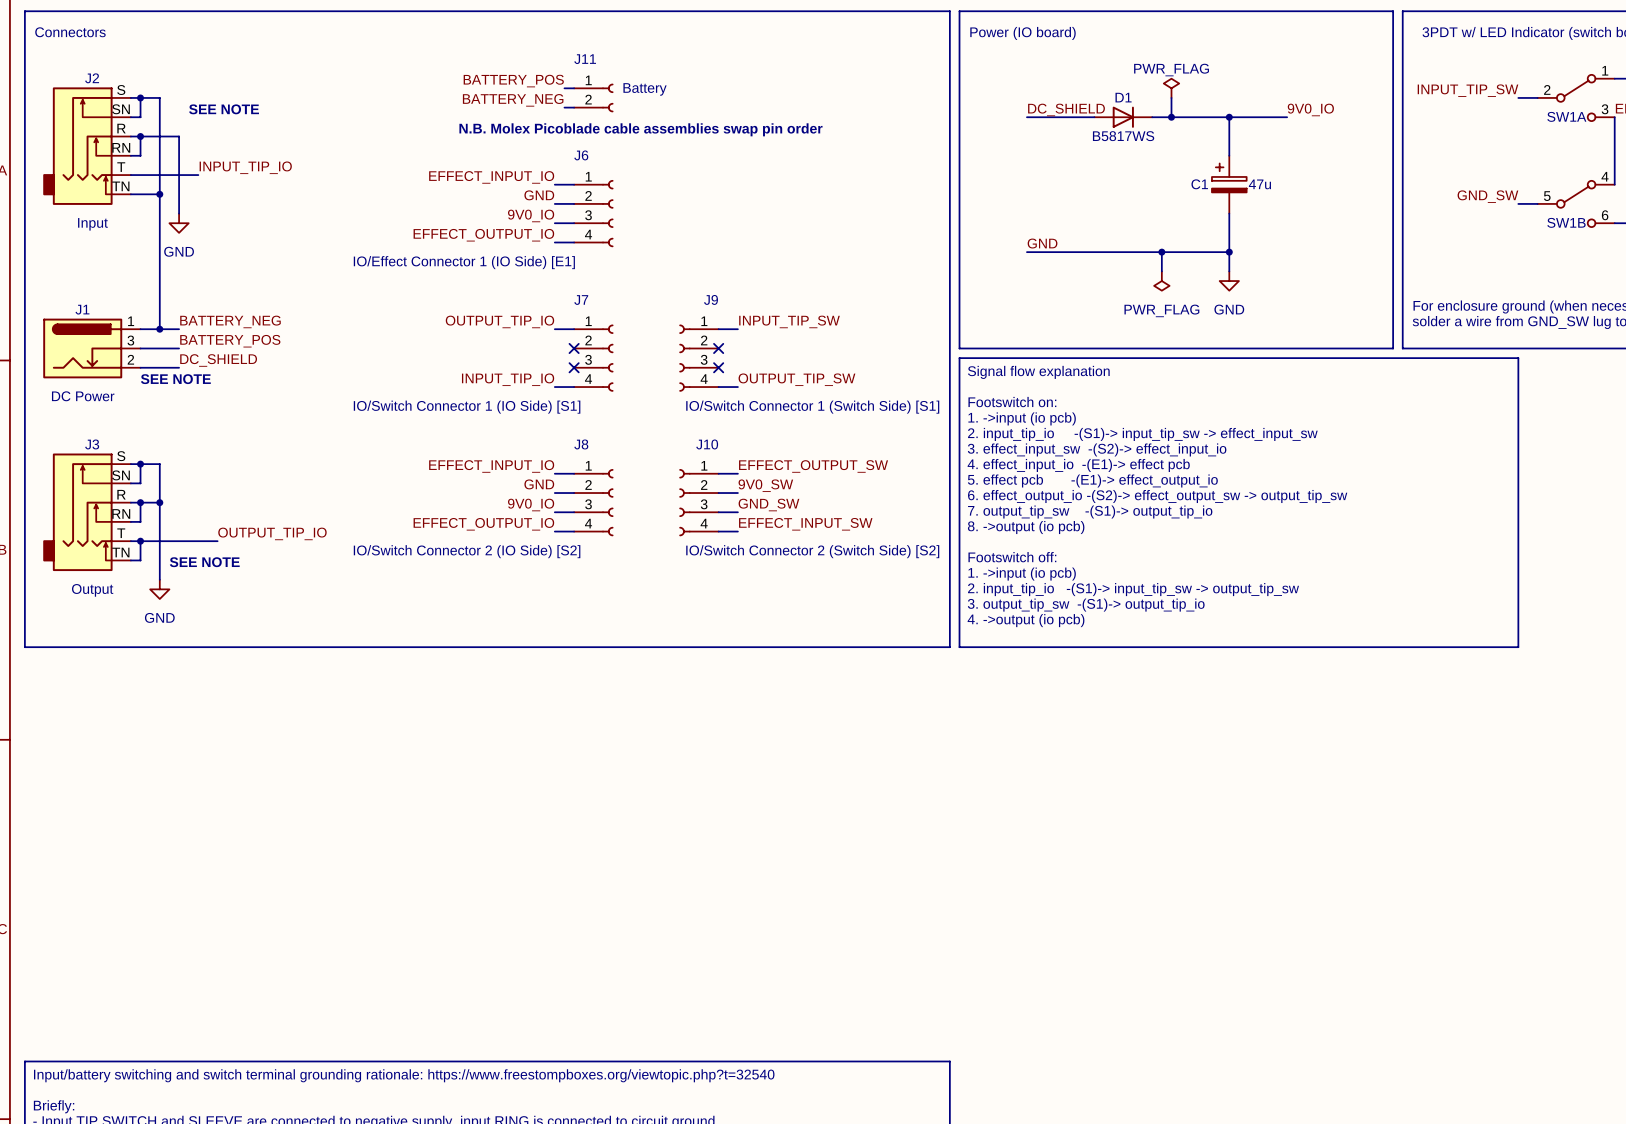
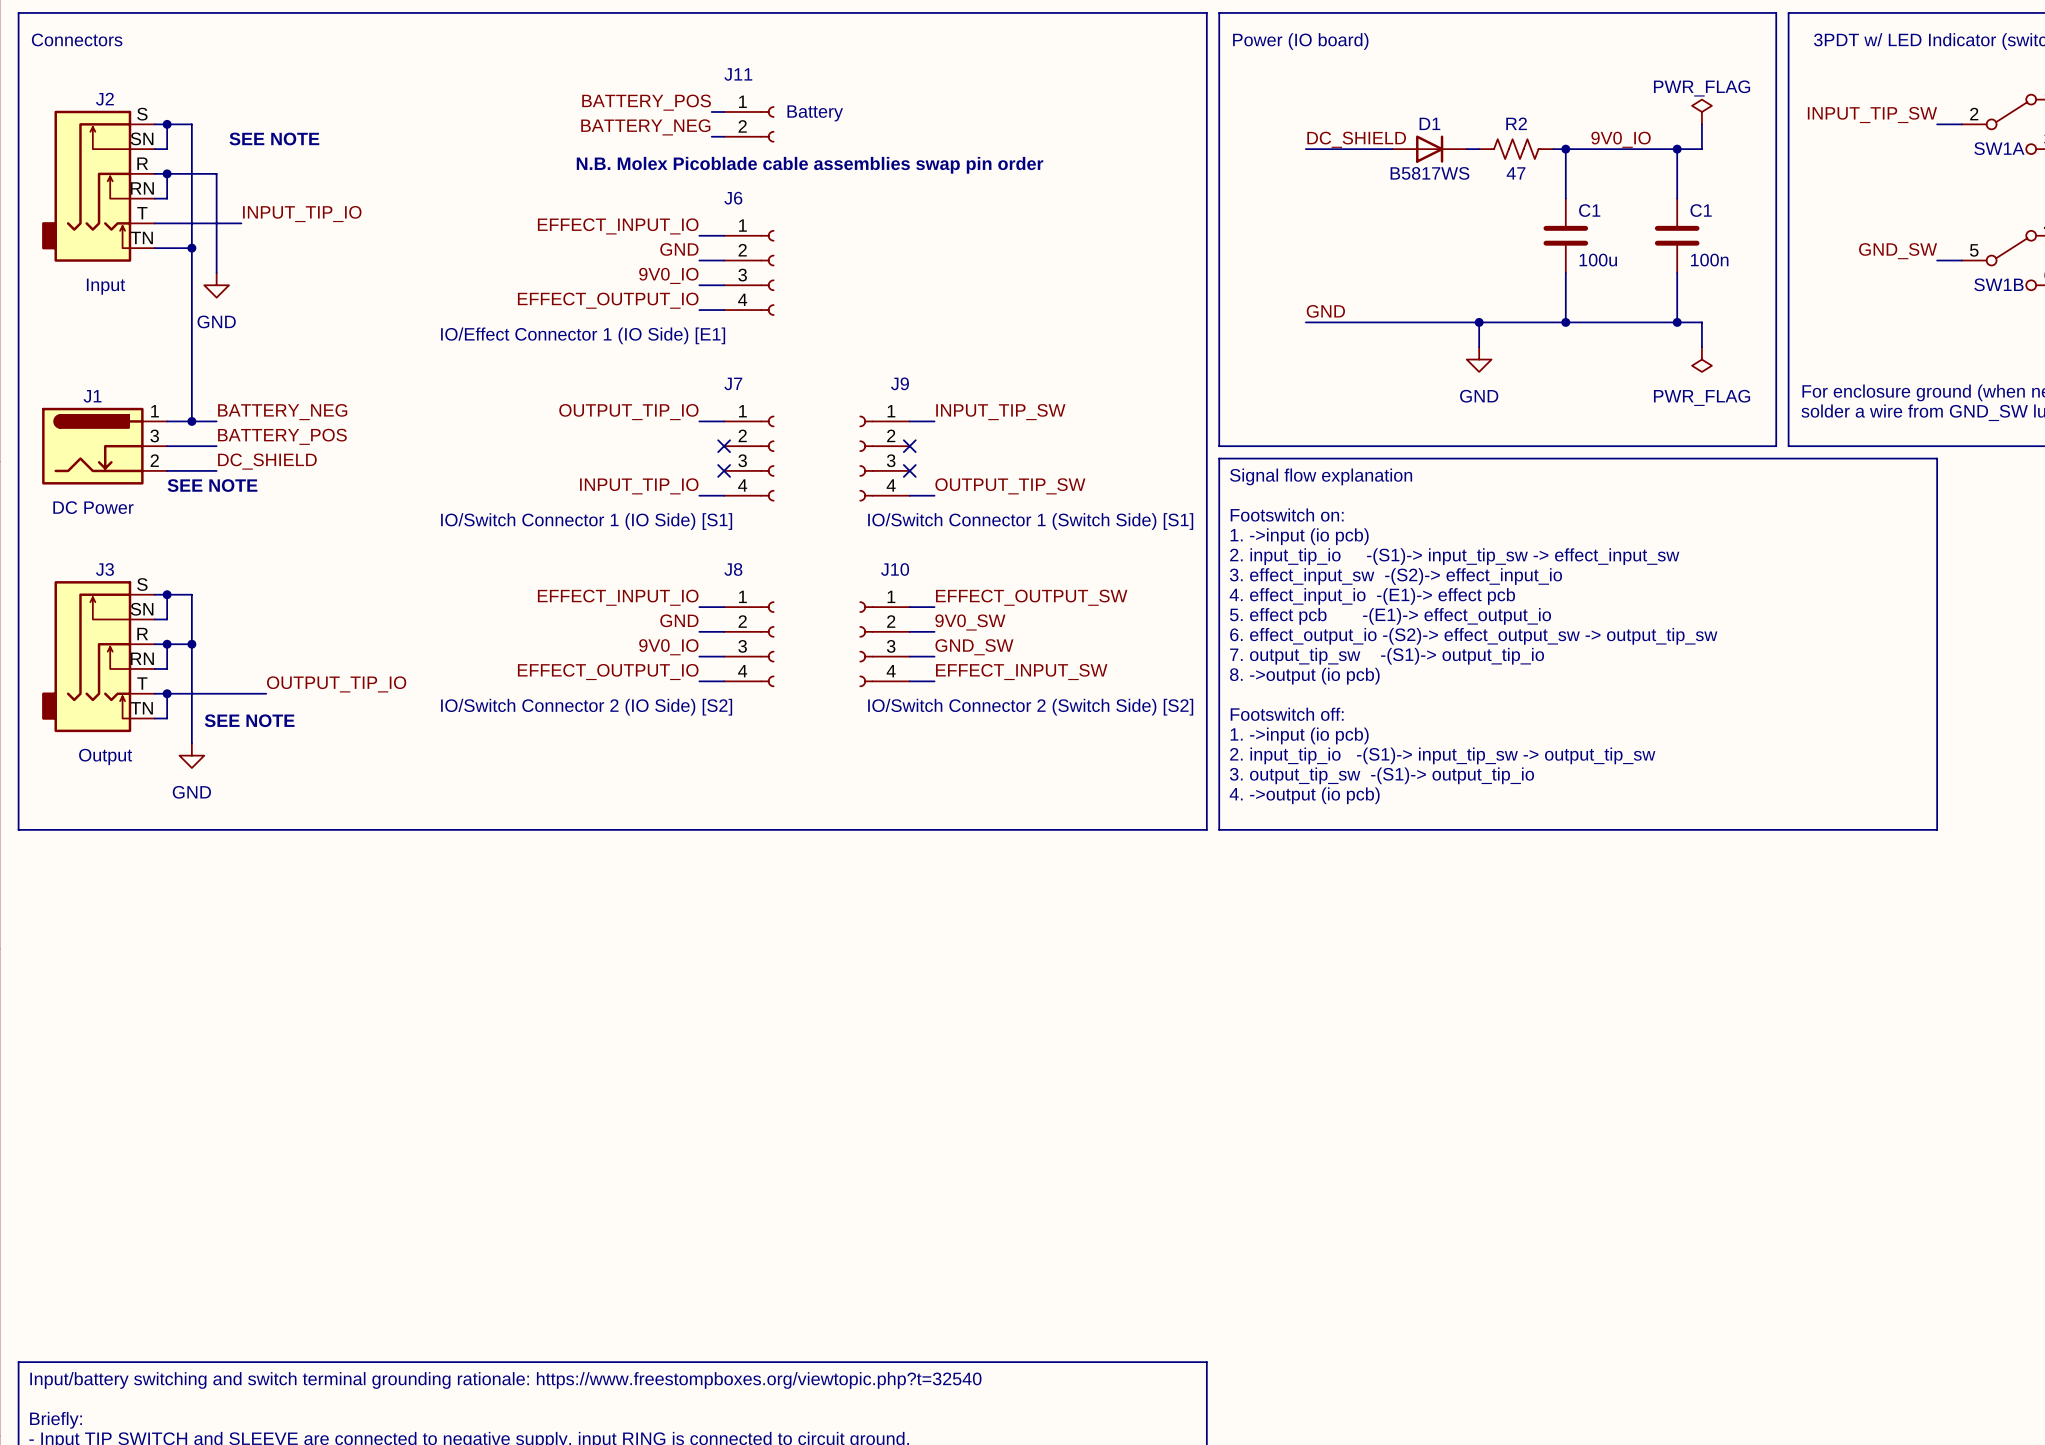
power symbol: PWR_FLAG (1171, 88) -> none
power symbol: none -> PWR_FLAG (1701, 111)
wire: (1171, 97) (1171, 117) -> none
wire: none -> (1701, 124) (1701, 149) (1640, 149)
label position: 9V0_IO (1310, 109) -> 9V0_IO (1621, 139)
junction: (1171, 117) -> none
R2: none -> 47 (1516, 149)
wire: none -> (1677, 149) (1677, 198)
junction: none -> (1677, 149)
C1 symbol: [1211, 155, 1247, 214] -> [1543, 198, 1589, 273]
C1 name position: C1 (1199, 184) -> C1 (1589, 210)
C1 value: 47u (1259, 184) -> 100u (1598, 260)
C1: none -> 100n (1677, 235)
wire: none -> (1677, 272) (1677, 322)
wire: (1229, 252) (1229, 271) -> (1565, 322) (1701, 322) (1701, 347)
junction: none -> (1677, 322)
power symbol: PWR_FLAG (1161, 281) -> GND (1479, 359)
power symbol: GND (1229, 281) -> none
power symbol: none -> PWR_FLAG (1701, 359)

